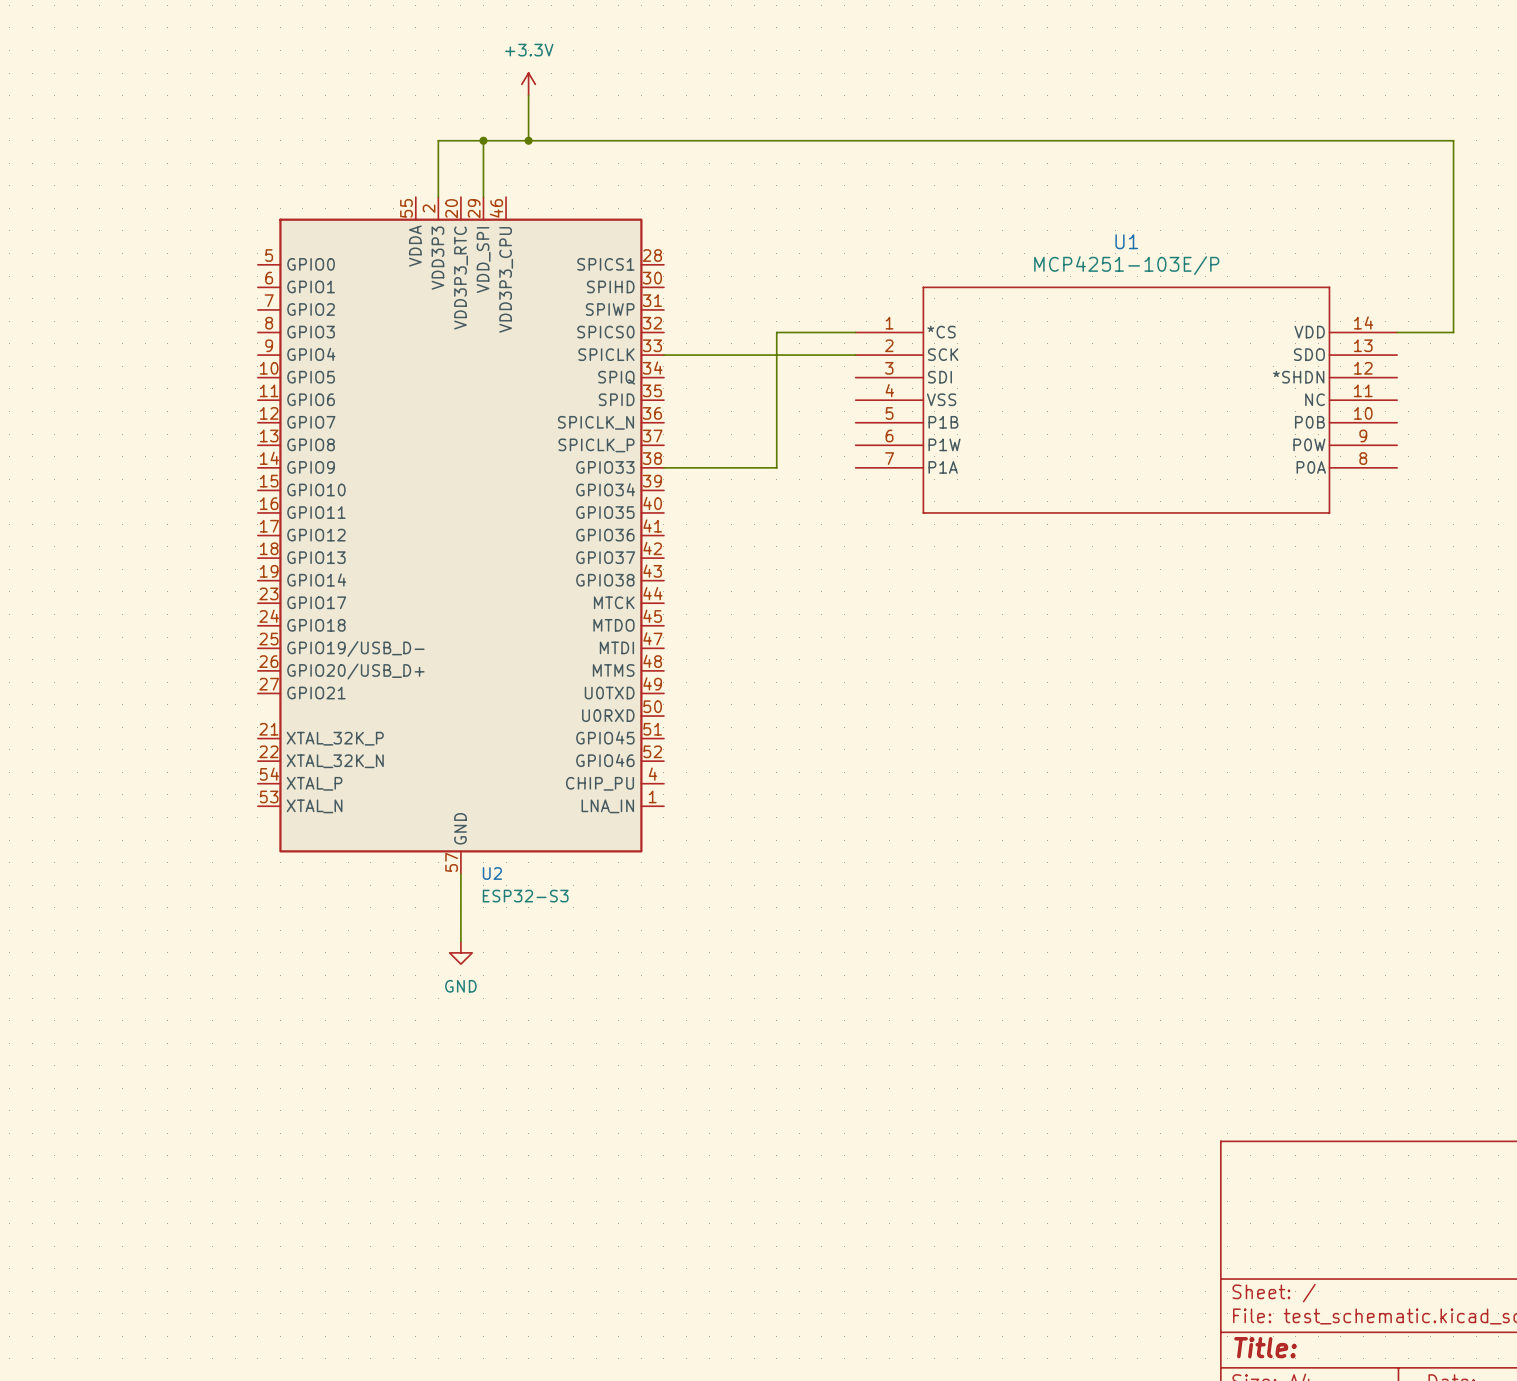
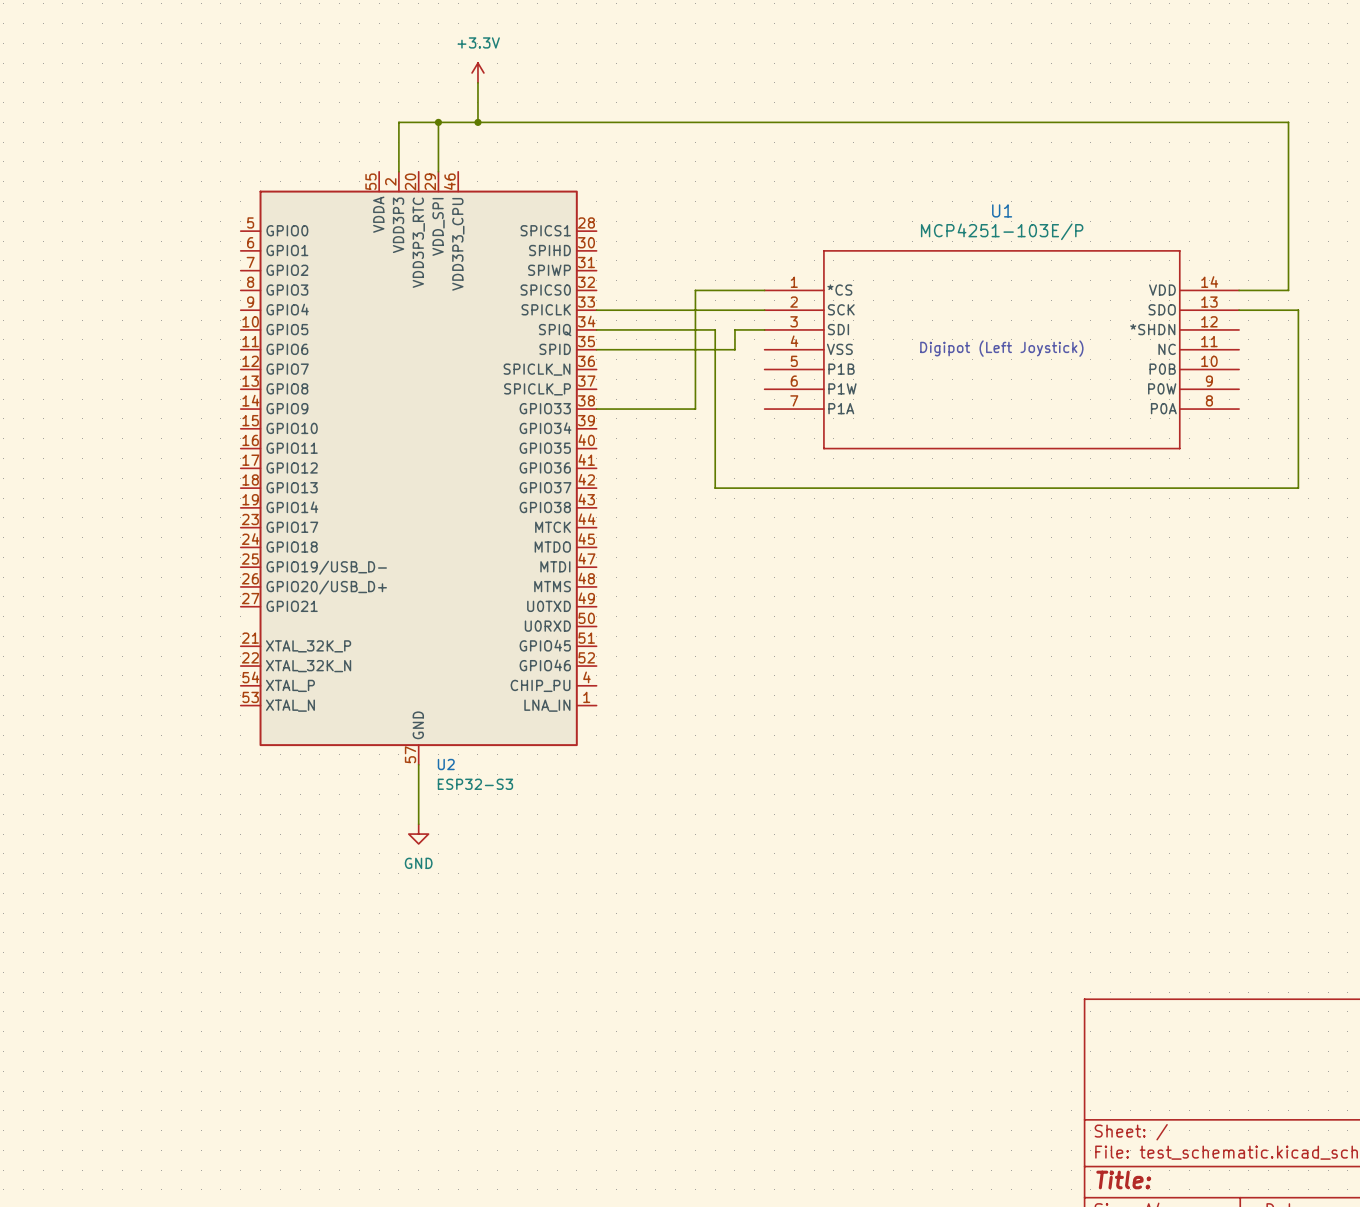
wire: none -> (1239, 310) (1298, 310) (1298, 488) (715, 488) (715, 329) (596, 329)
wire: none -> (764, 329) (734, 329) (734, 349) (596, 349)
text: none -> Digipot (Left Joystick) (1001, 348)

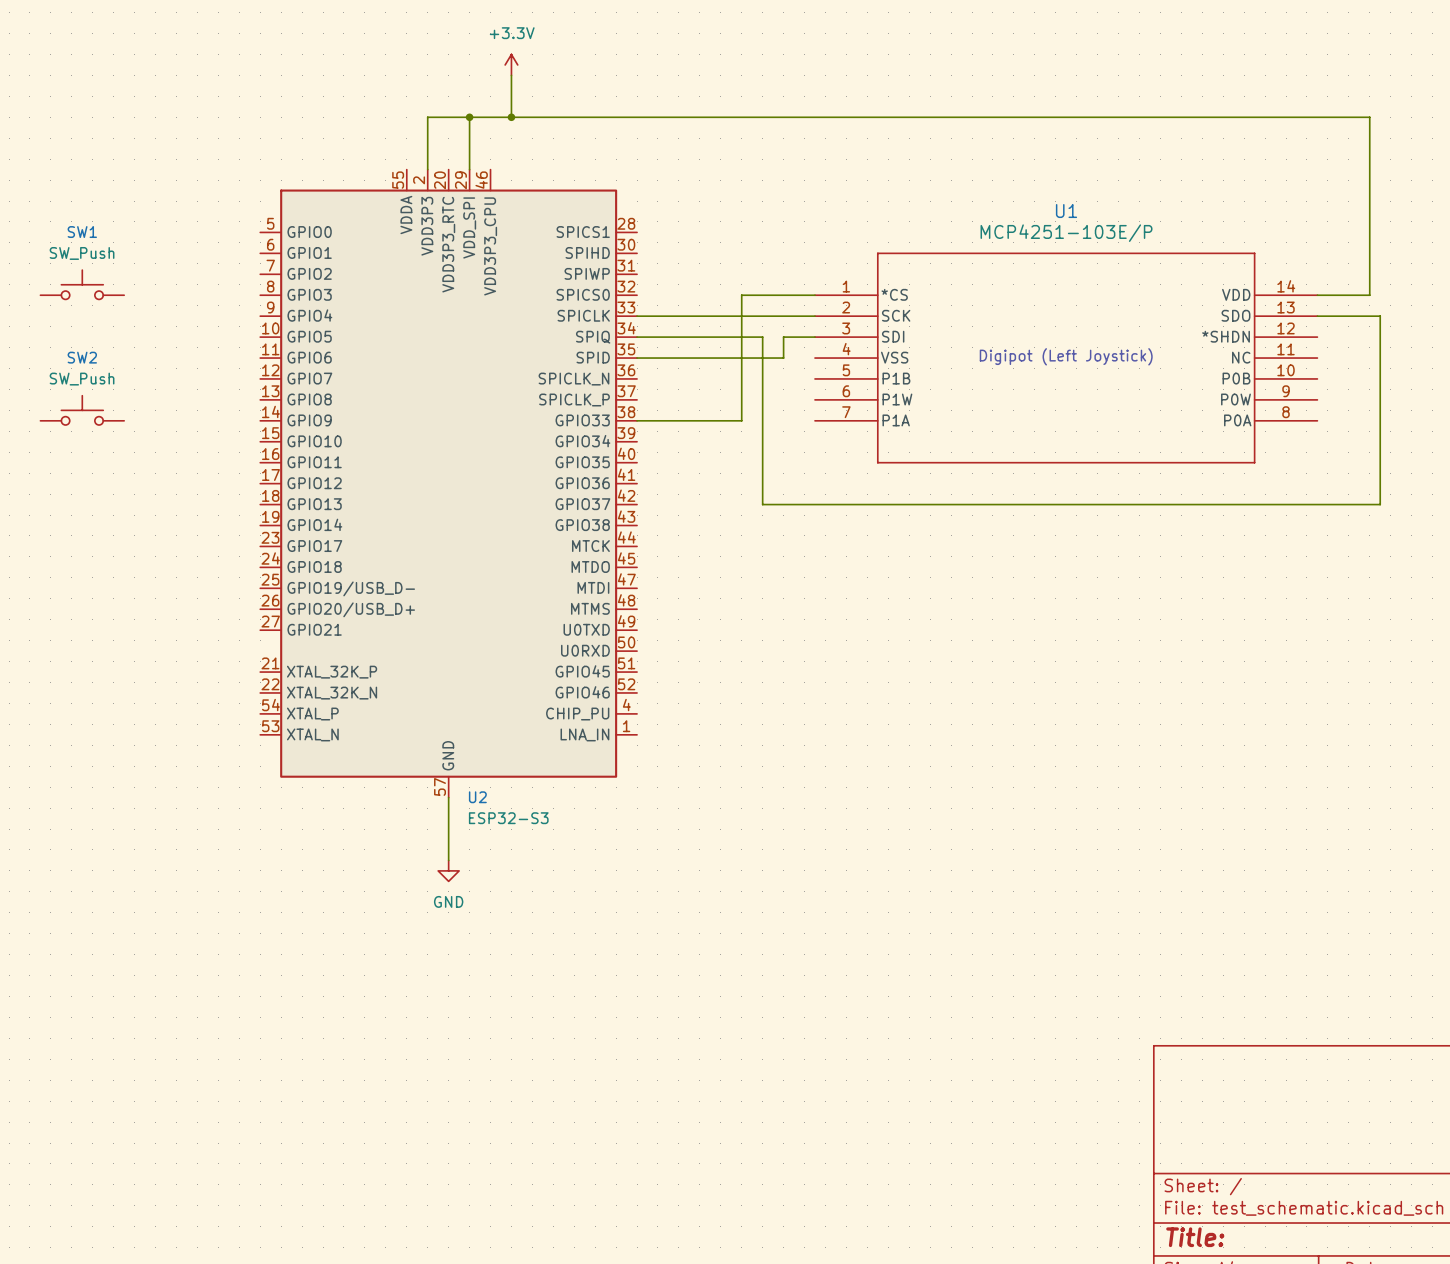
SW1: none -> SW_Push (82, 284)
SW2: none -> SW_Push (82, 410)

